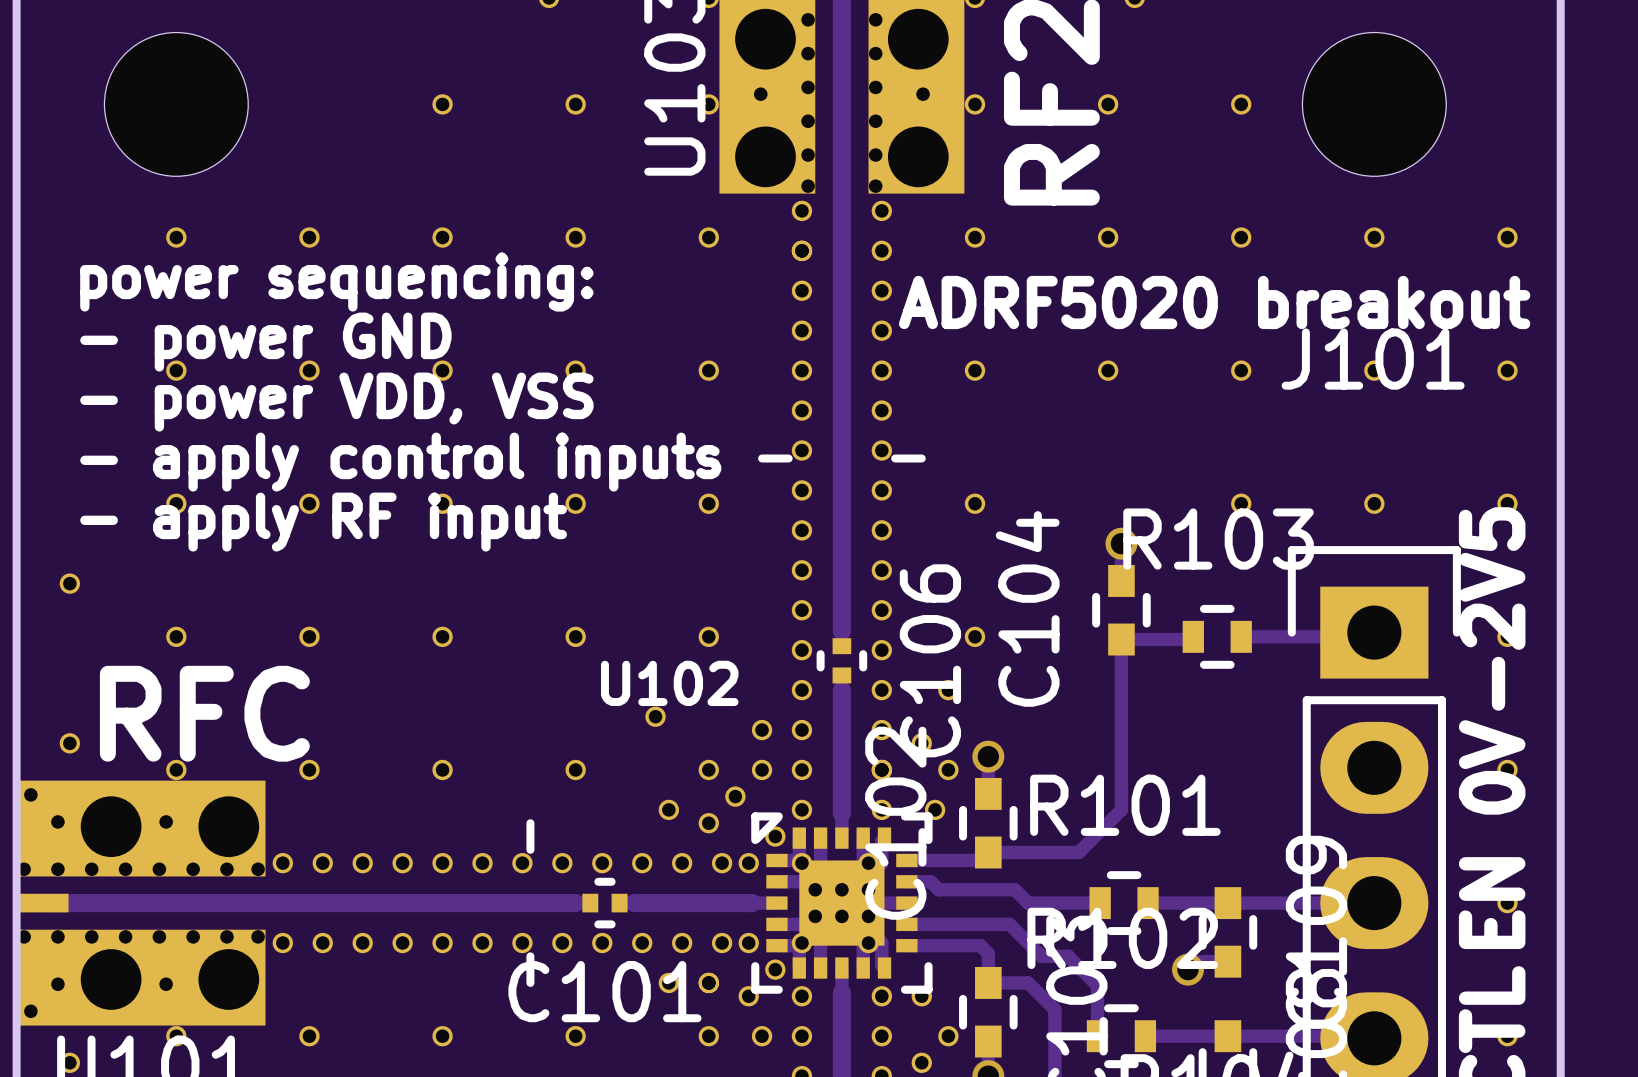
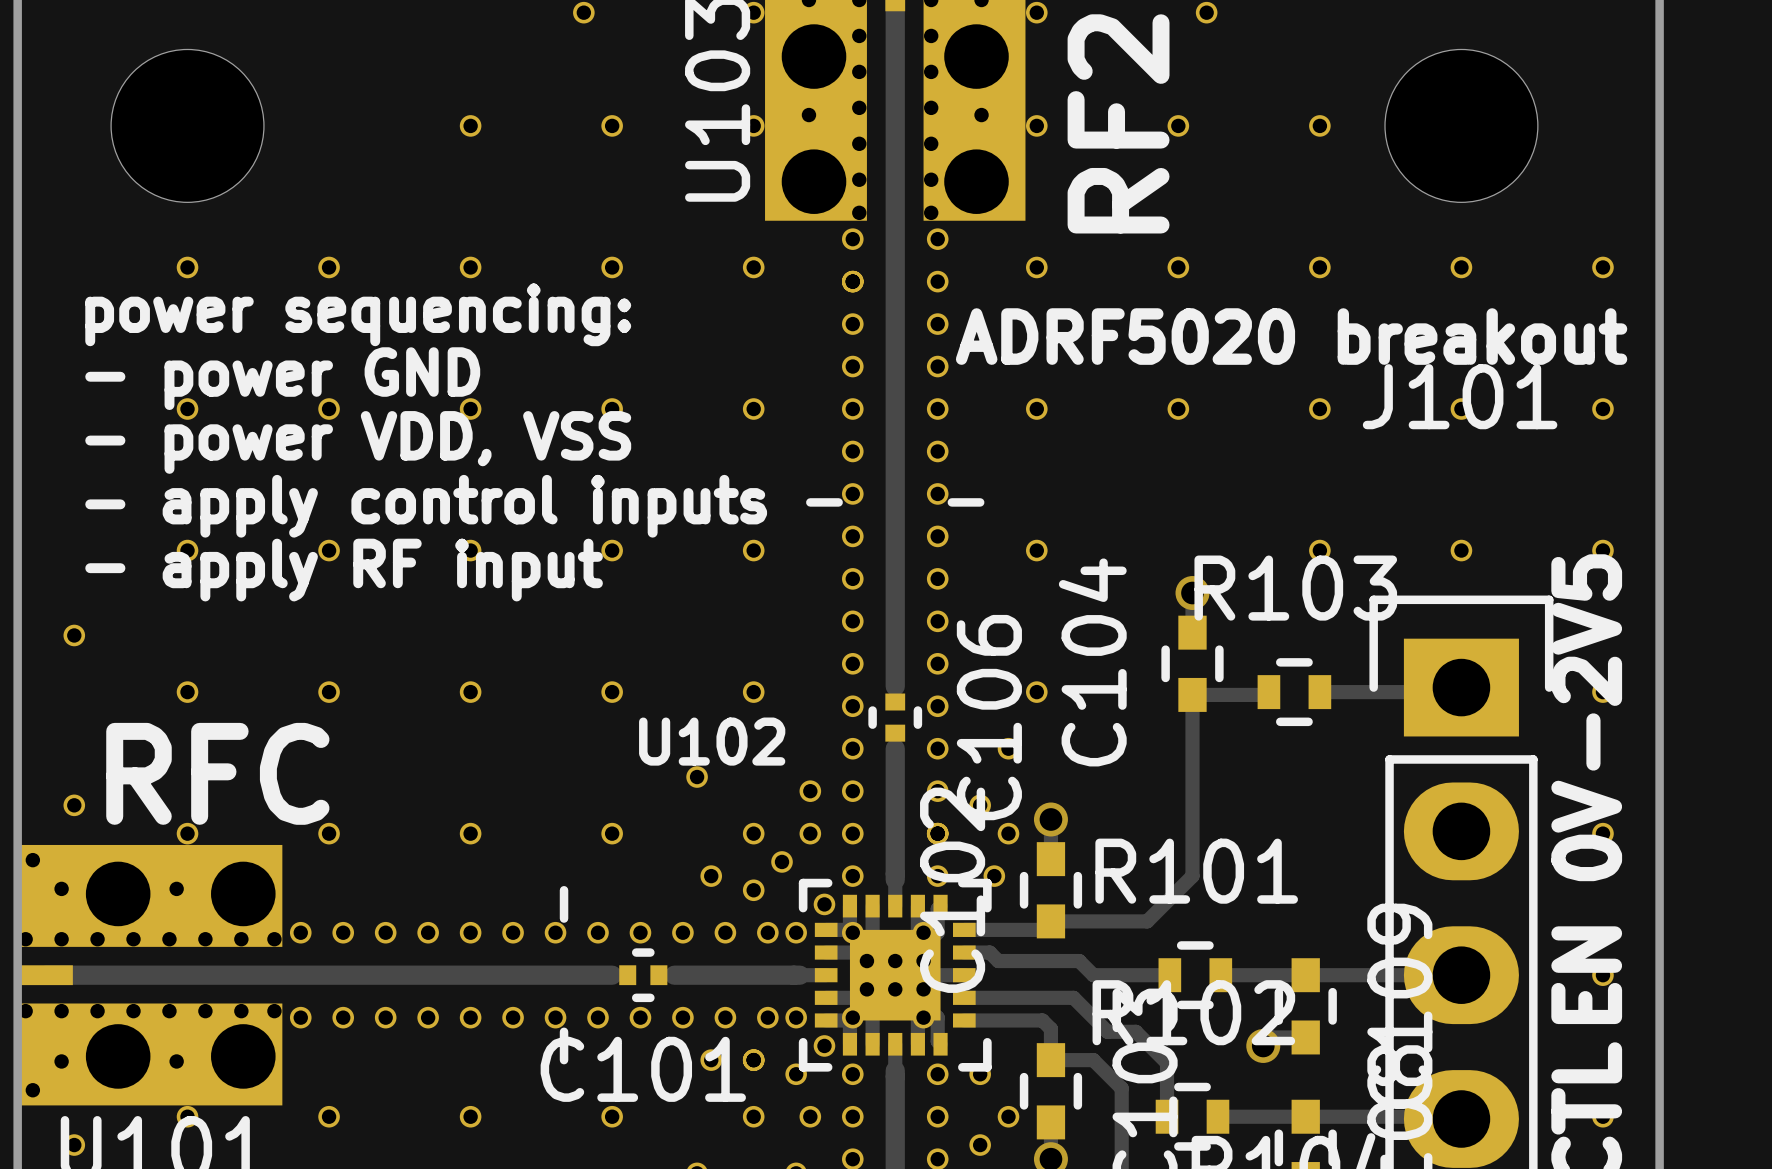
U102 footprint: [751, 812, 933, 994] -> [798, 878, 992, 1072]

